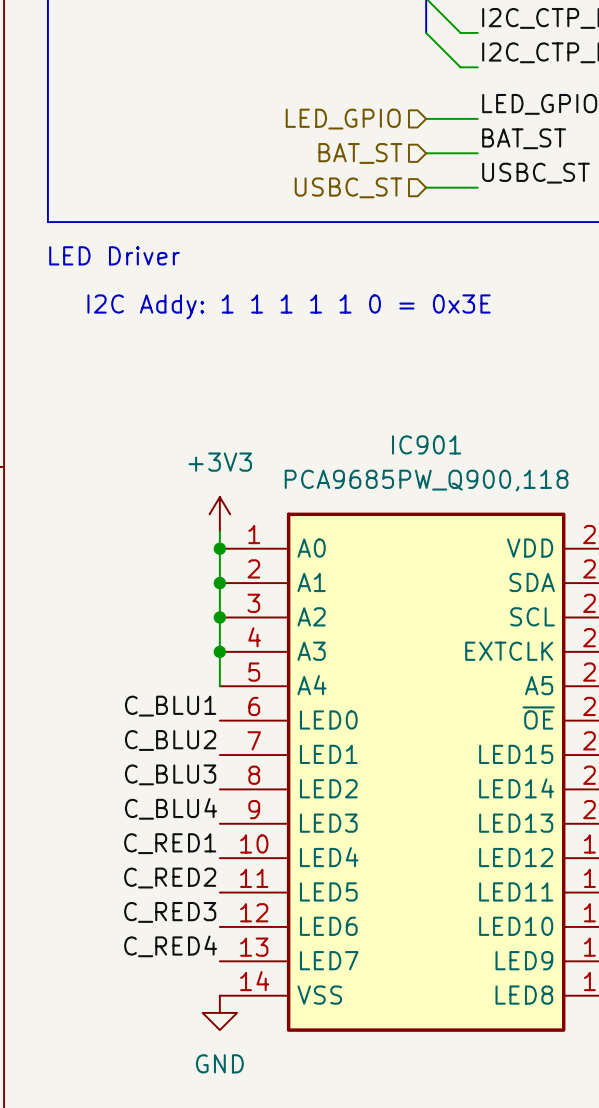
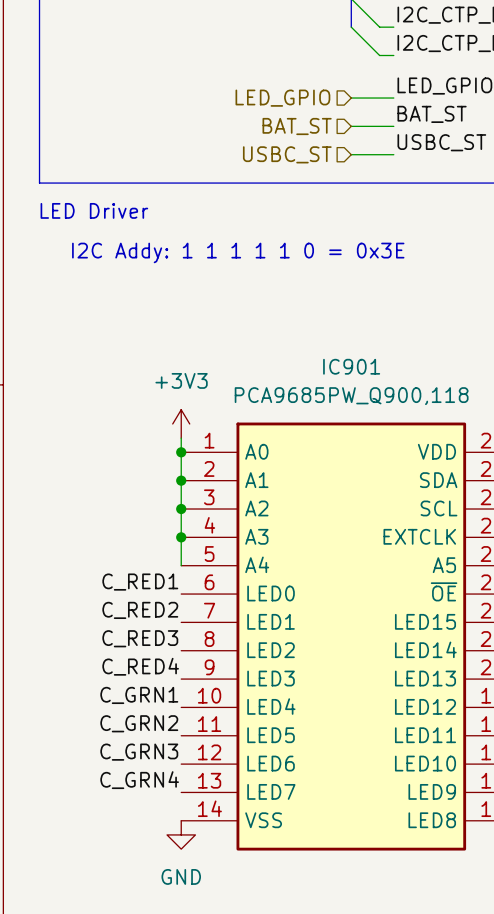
label: C_BLU1 (170, 706) -> C_RED1 (140, 582)
label: C_BLU2 (170, 740) -> C_RED2 (140, 610)
label: C_BLU3 (170, 774) -> C_RED3 (140, 638)
label: C_BLU4 (171, 808) -> C_RED4 (140, 666)
label: C_RED1 (170, 843) -> C_GRN1 (139, 695)
label: C_RED2 (170, 878) -> C_GRN2 (139, 723)
label: C_RED3 (170, 912) -> C_GRN3 (139, 752)
label: C_RED4 (170, 946) -> C_GRN4 (139, 780)

